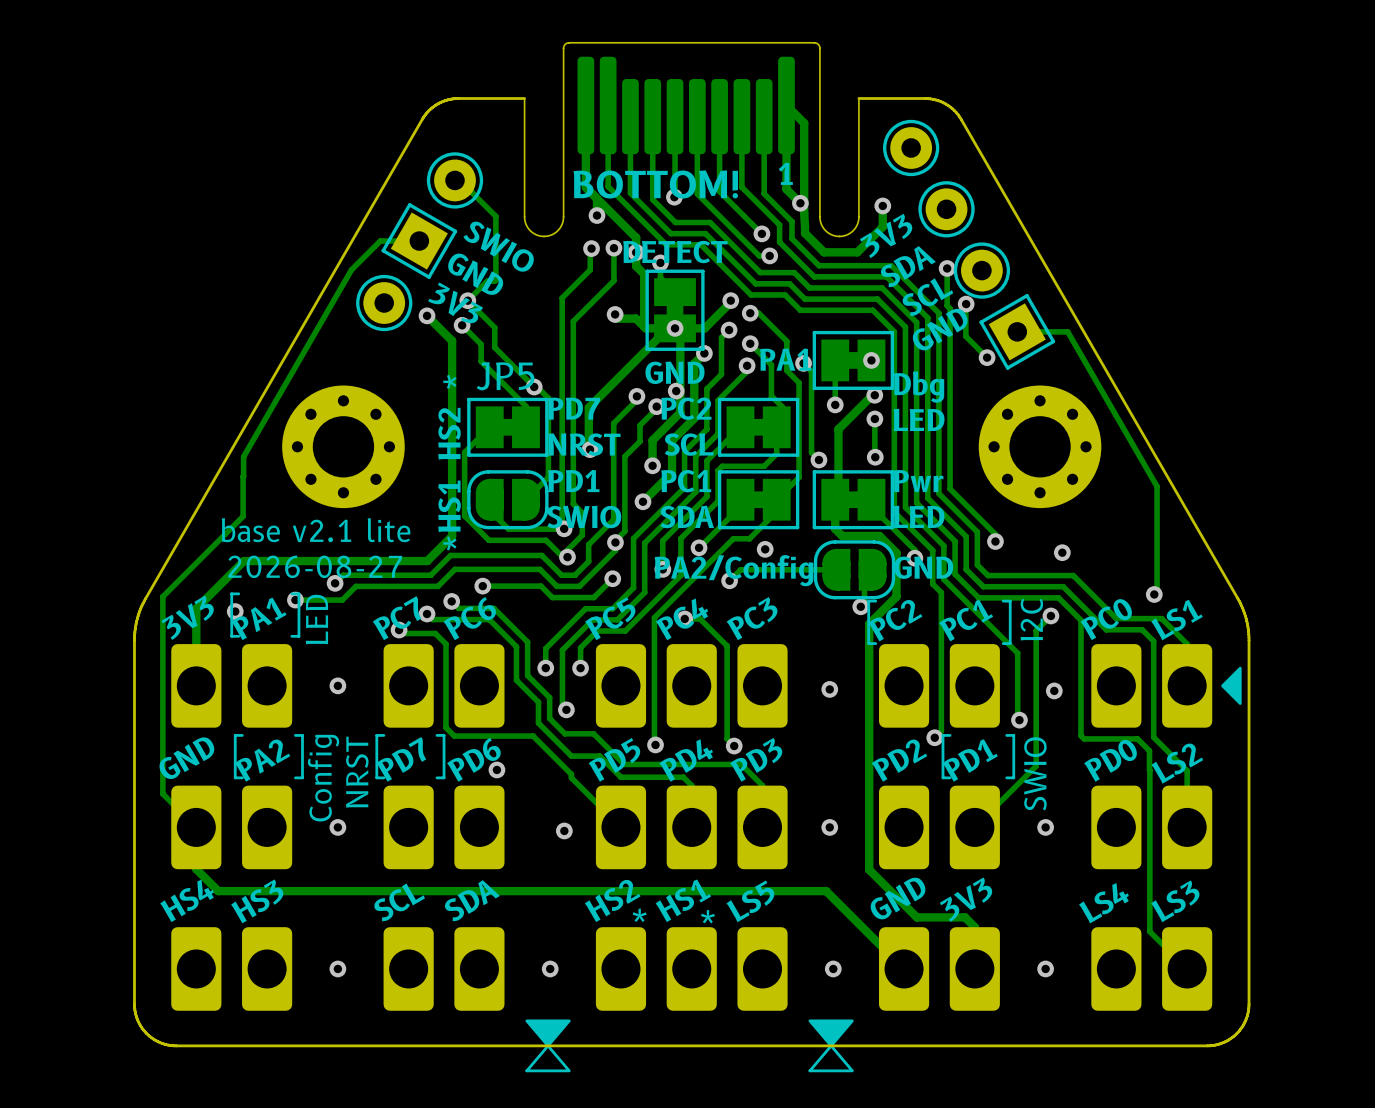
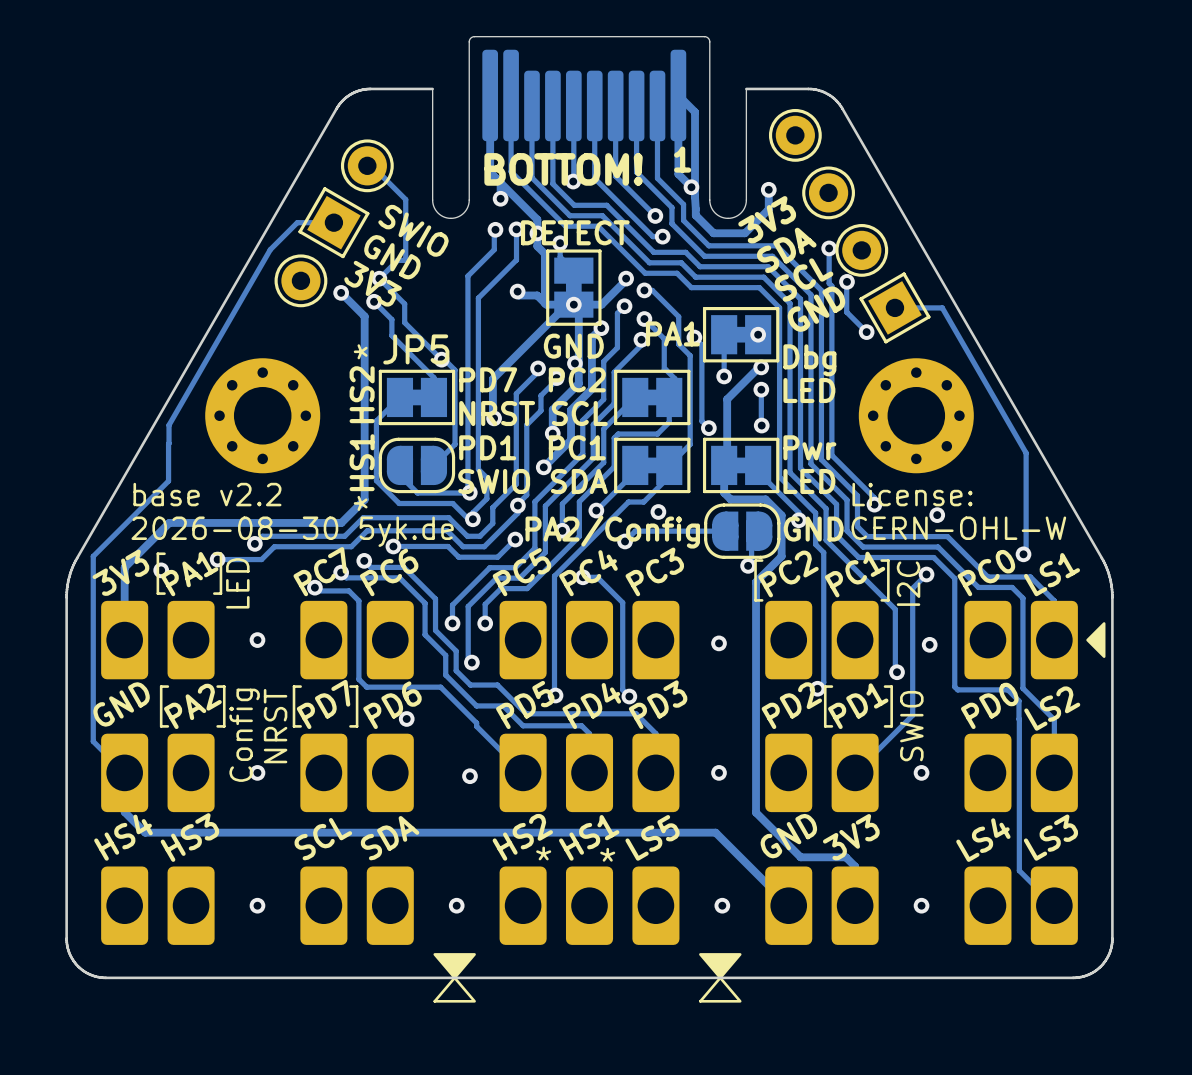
text: base v2.1 lite (316, 530) -> base v2.2 (207, 494)
text: none -> License: (912, 494)
text: 2026-08-27 (315, 566) -> none
text: none -> CERN-OHL-W (958, 528)
text: none -> 2026-08-30 5yk.de (292, 531)

